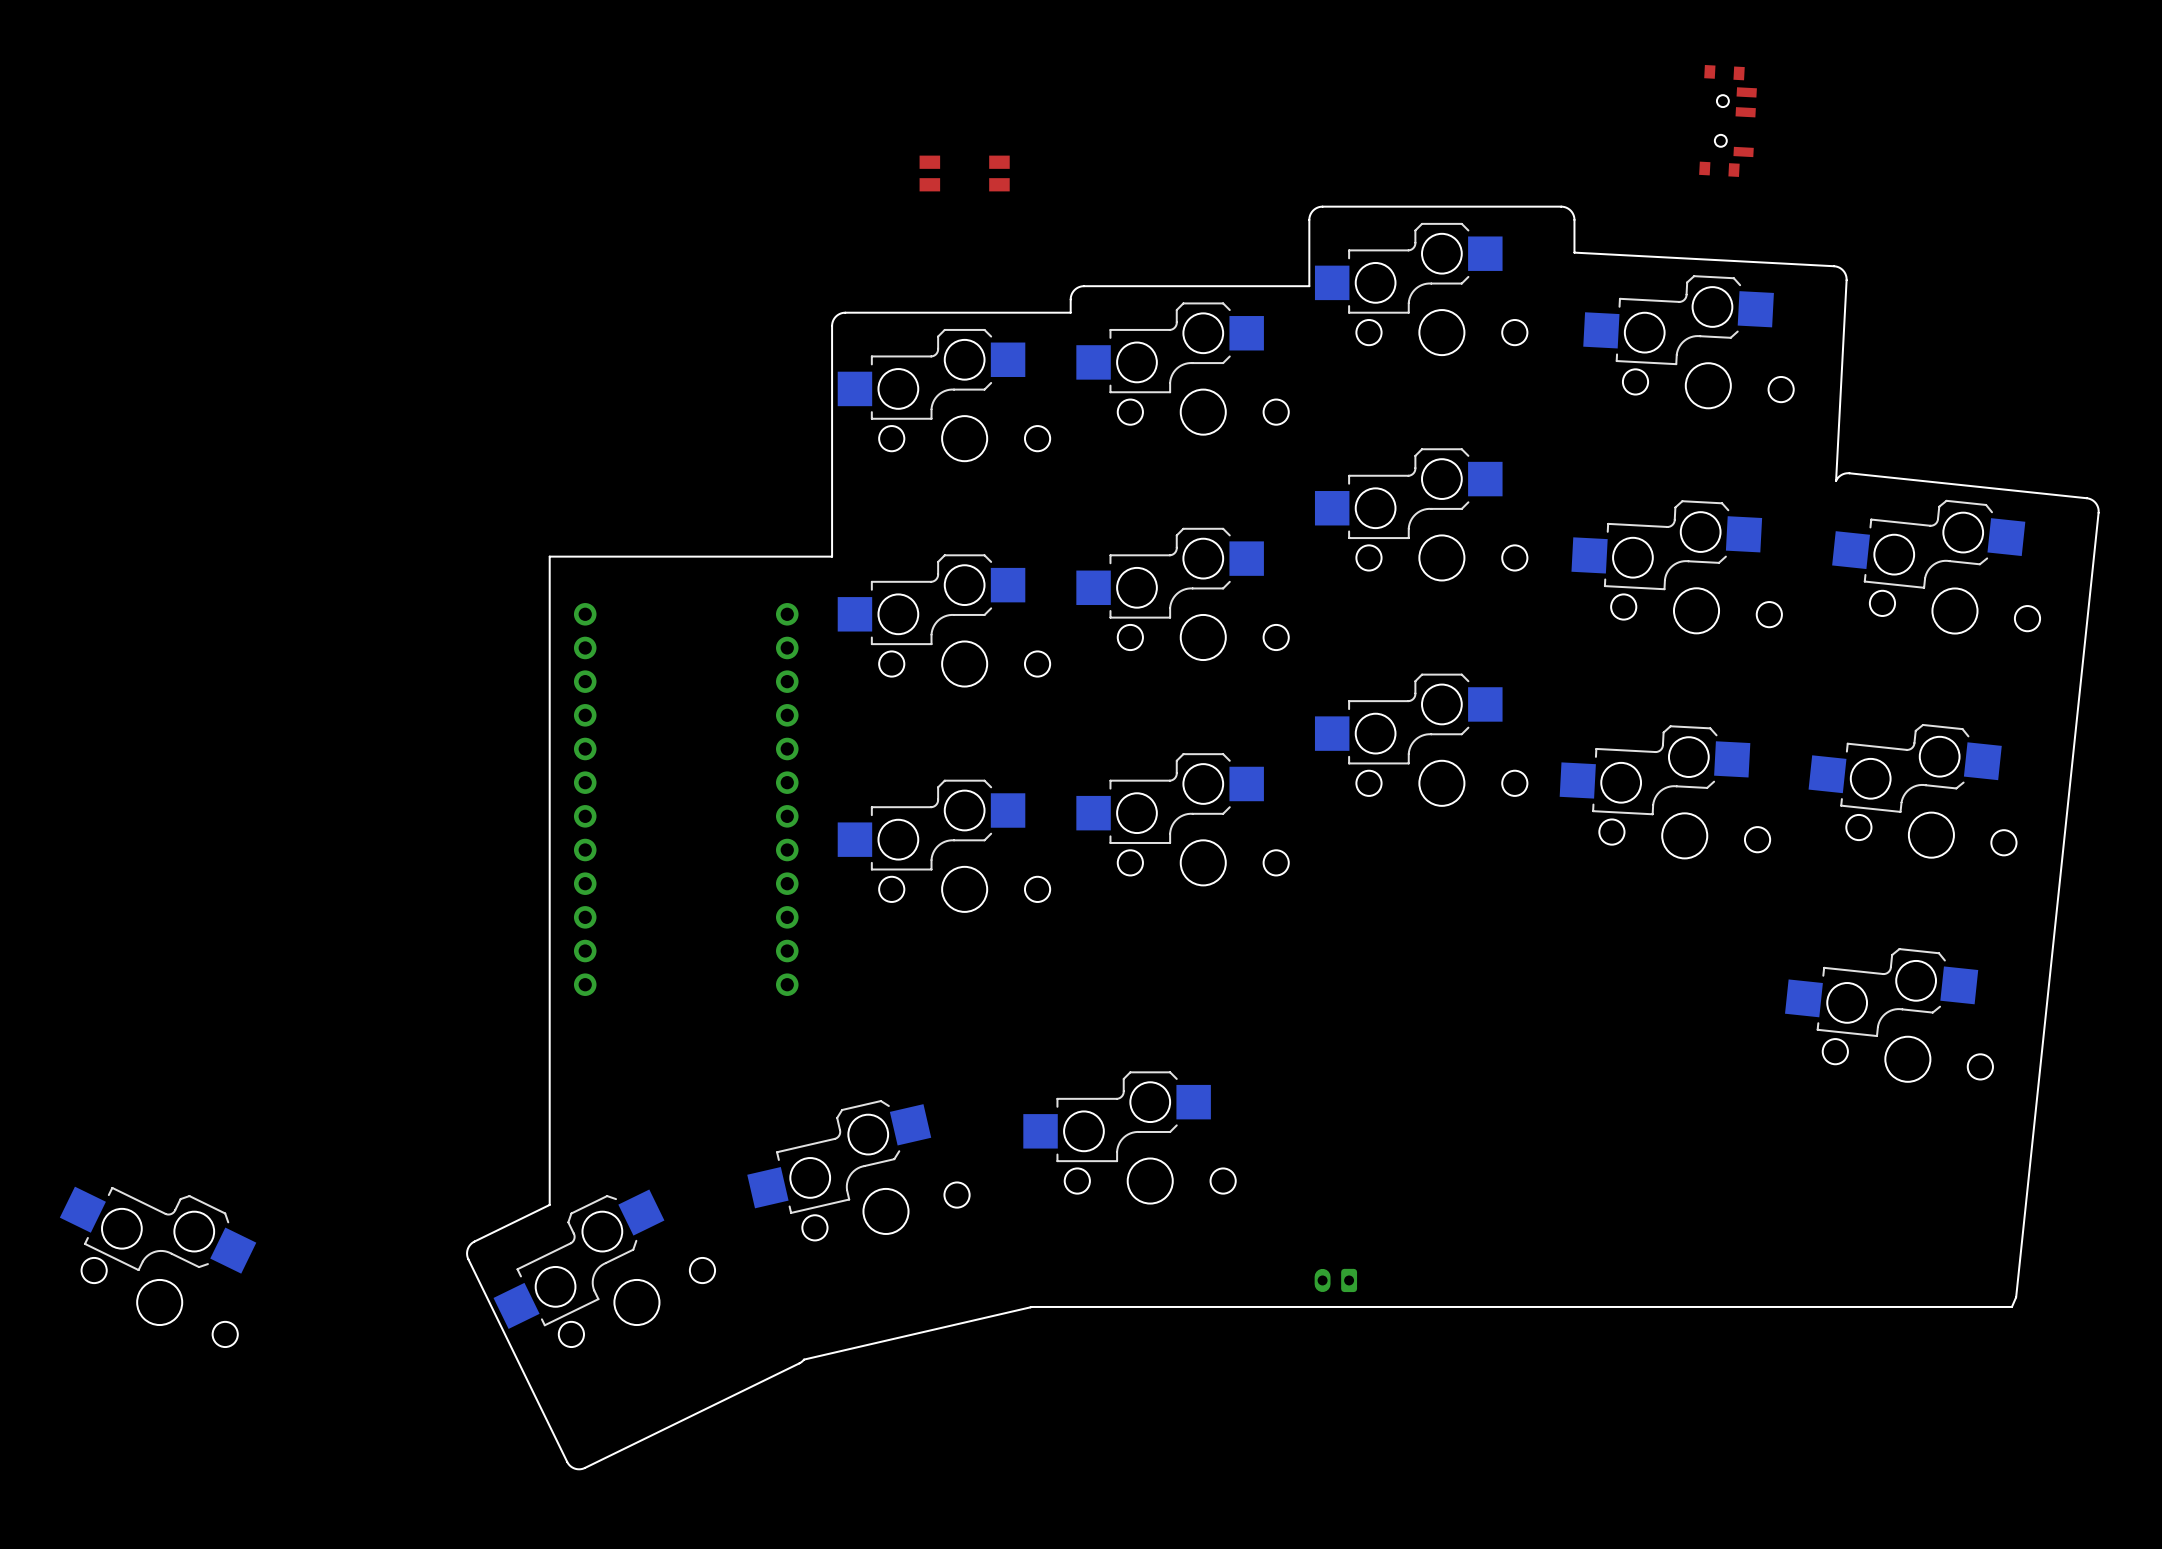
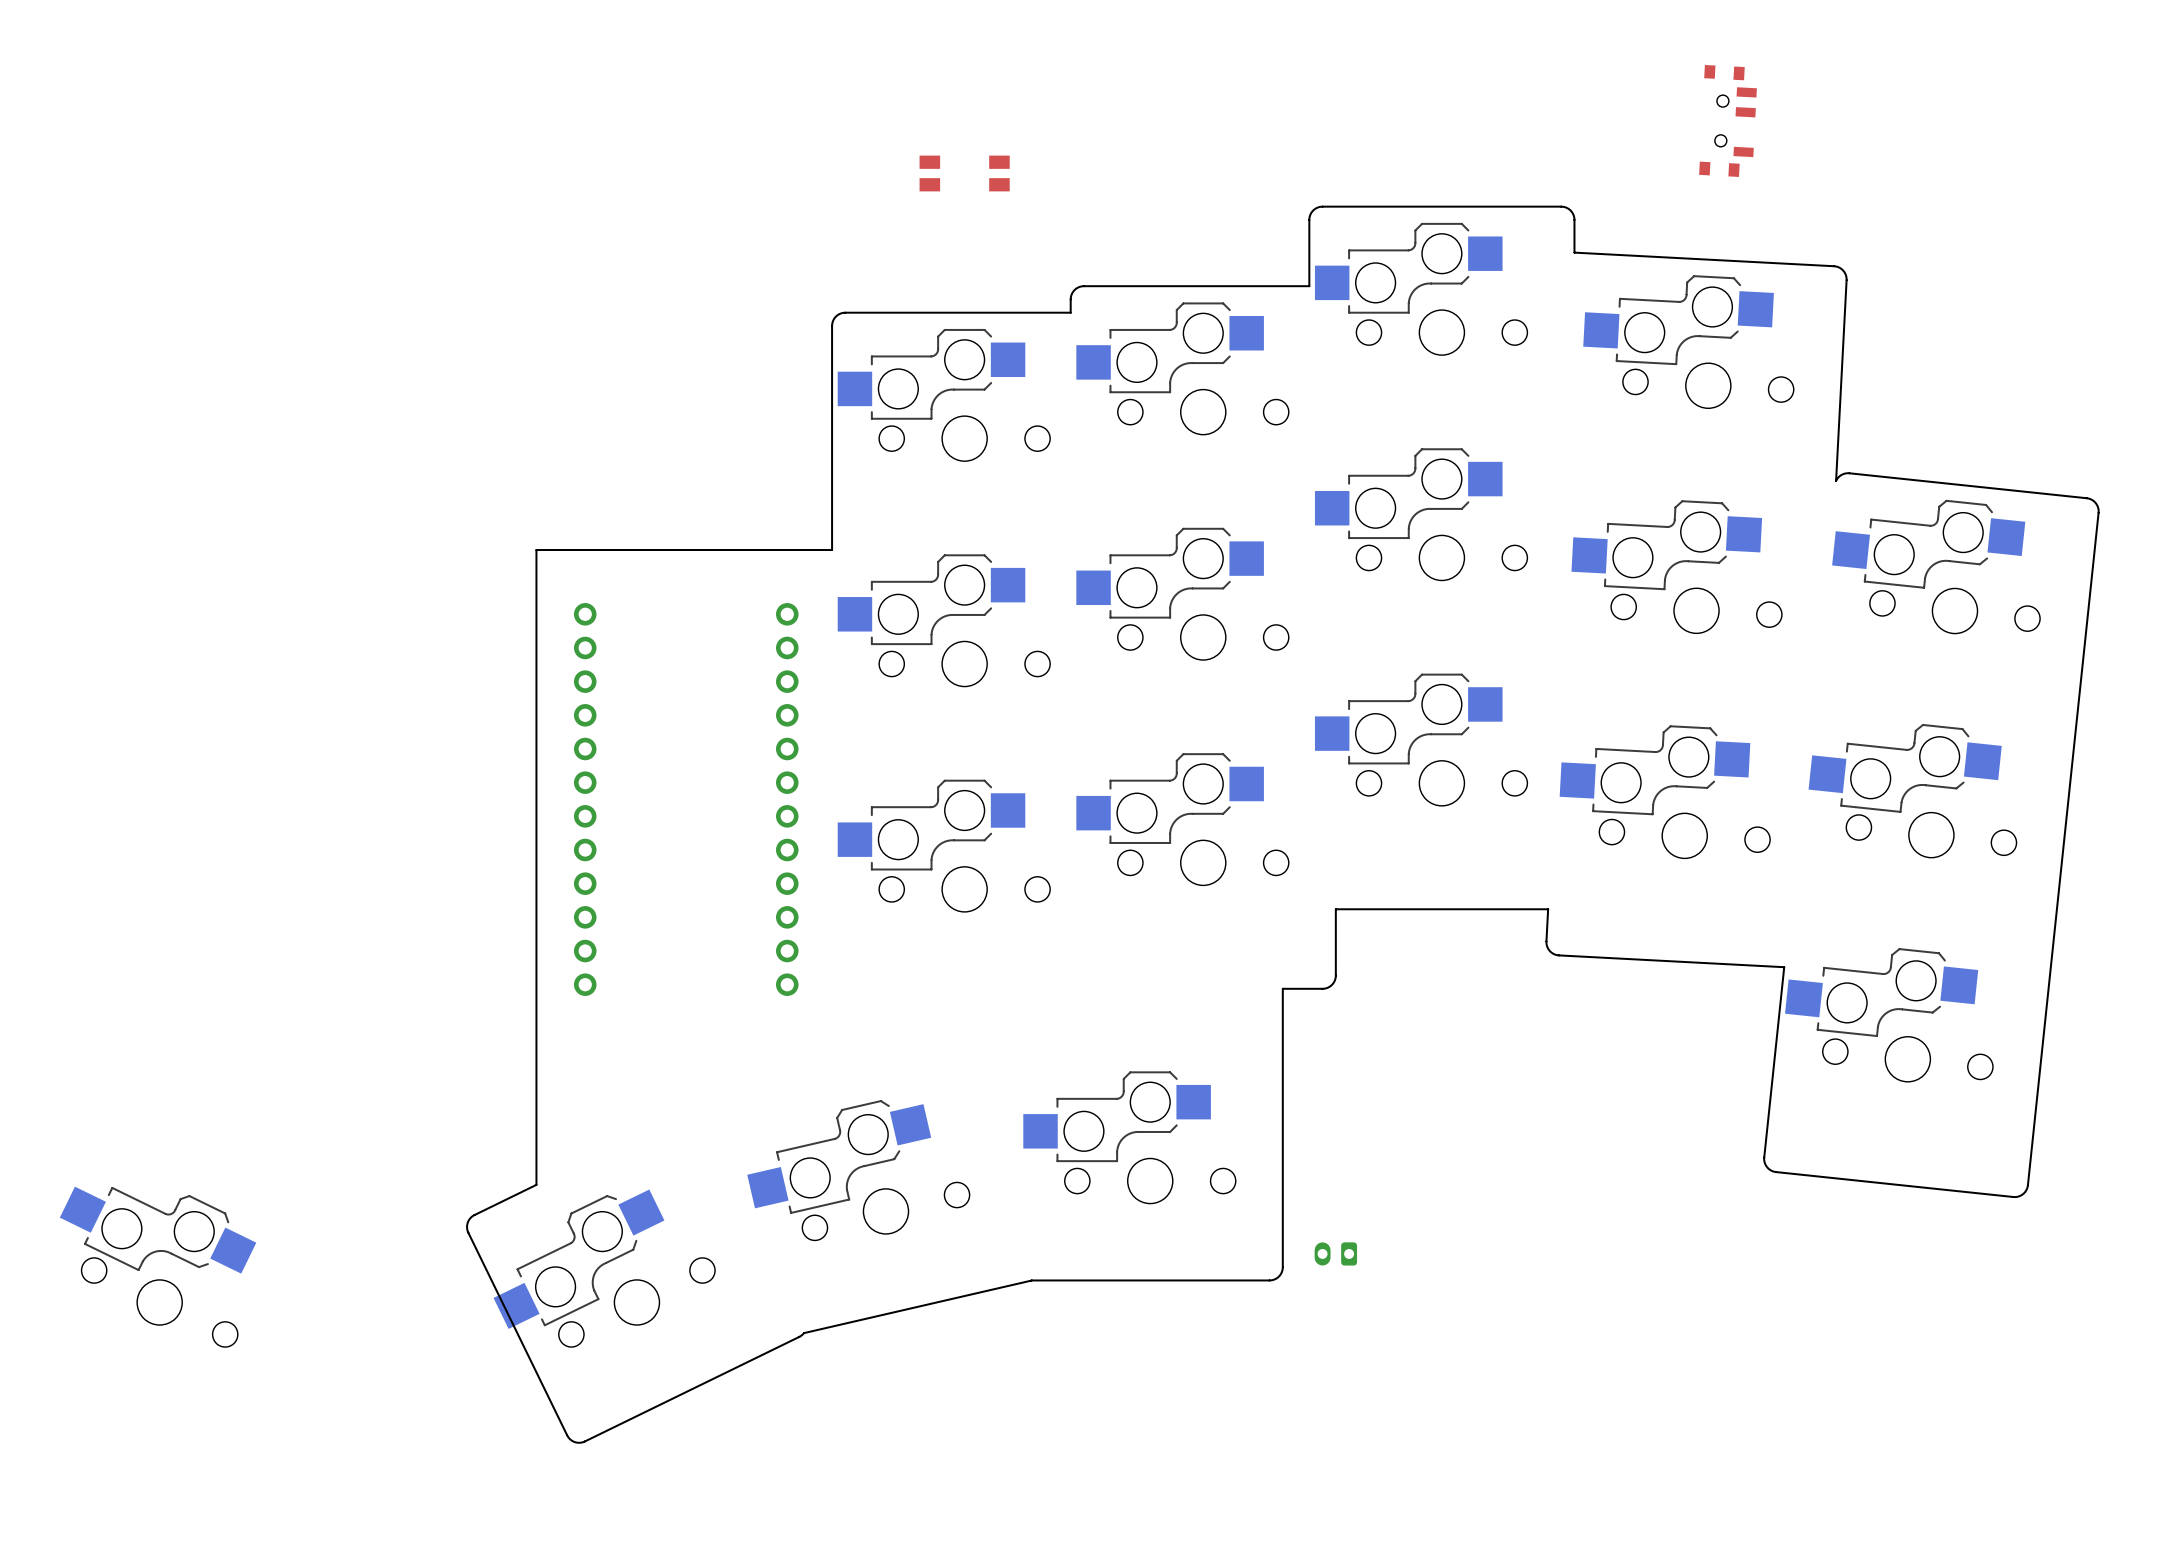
board edge: (832, 550) (832, 556) (549, 556) (549, 1204) (473, 1242) (469, 1246) (467, 1253) (567, 1461) (573, 1468) (584, 1467) (804, 1359) (1031, 1306) (2011, 1306) (2016, 1297) (2027, 1185) -> (832, 550) (536, 550) (536, 1184) (473, 1215) (468, 1221) (467, 1227) (567, 1435) (573, 1441) (584, 1441) (804, 1333) (1031, 1280) (1269, 1280) (1276, 1278) (1281, 1272) (1282, 1267) (1282, 988) (1324, 988) (1333, 982) (1335, 975) (1335, 909) (1548, 909) (1546, 944) (1549, 951) (1557, 955) (1784, 967) (1764, 1157) (1768, 1168) (1776, 1172) (2013, 1197) (2023, 1194) (2027, 1185)
part position: (1335, 1280) -> (1335, 1253)

